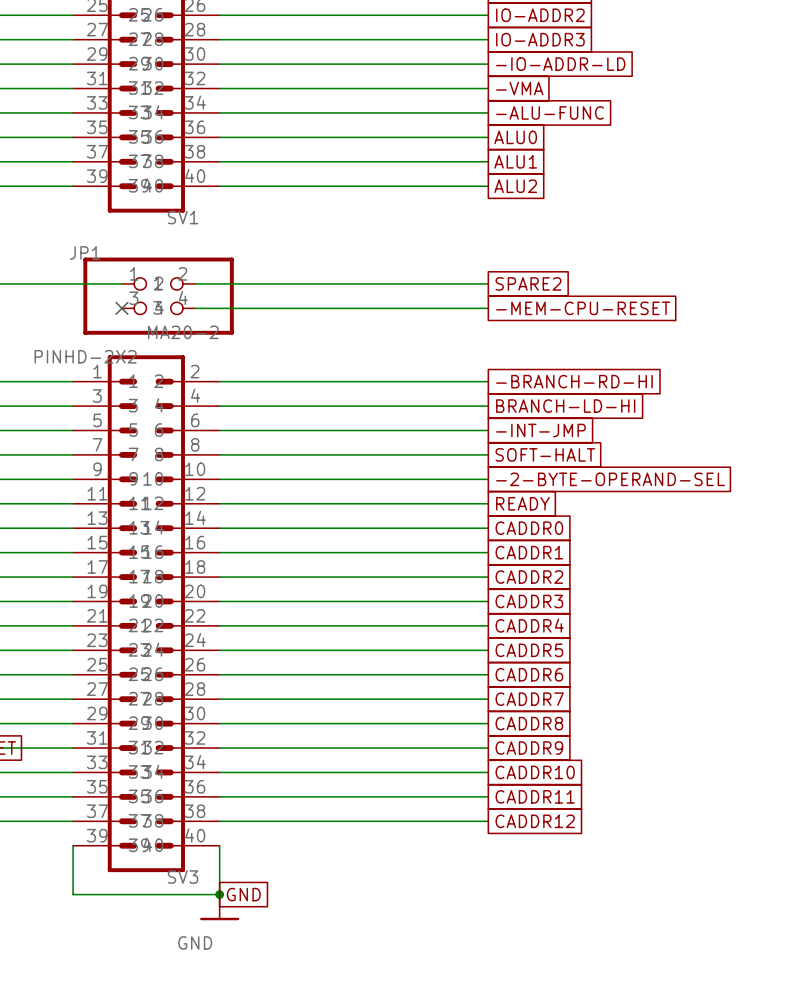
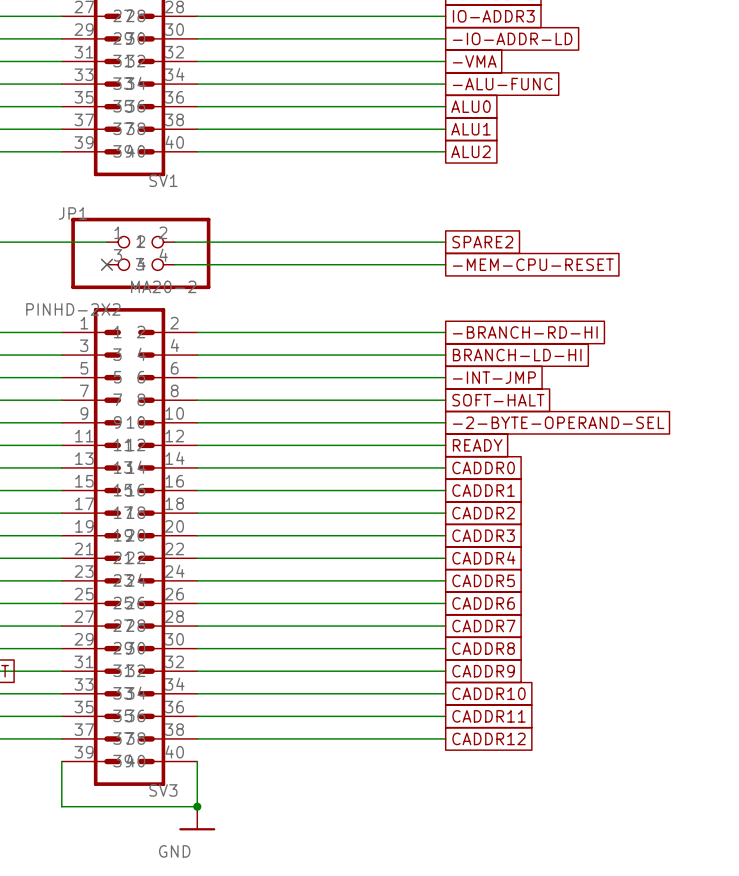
global label: GND (243, 894) -> none

